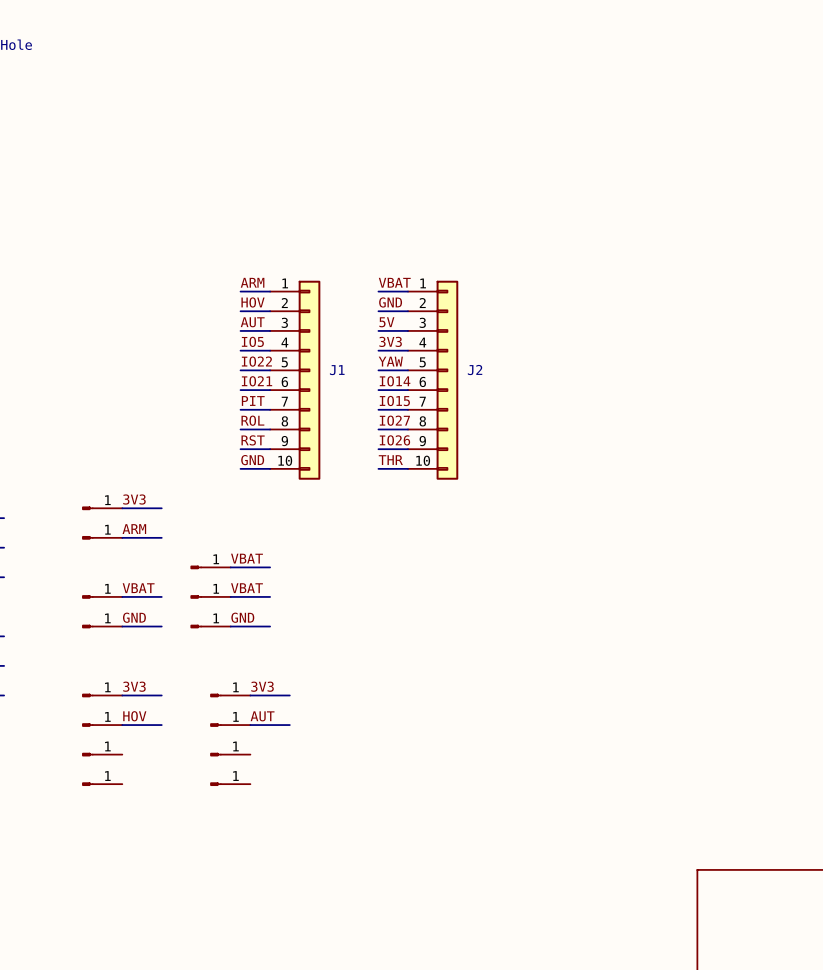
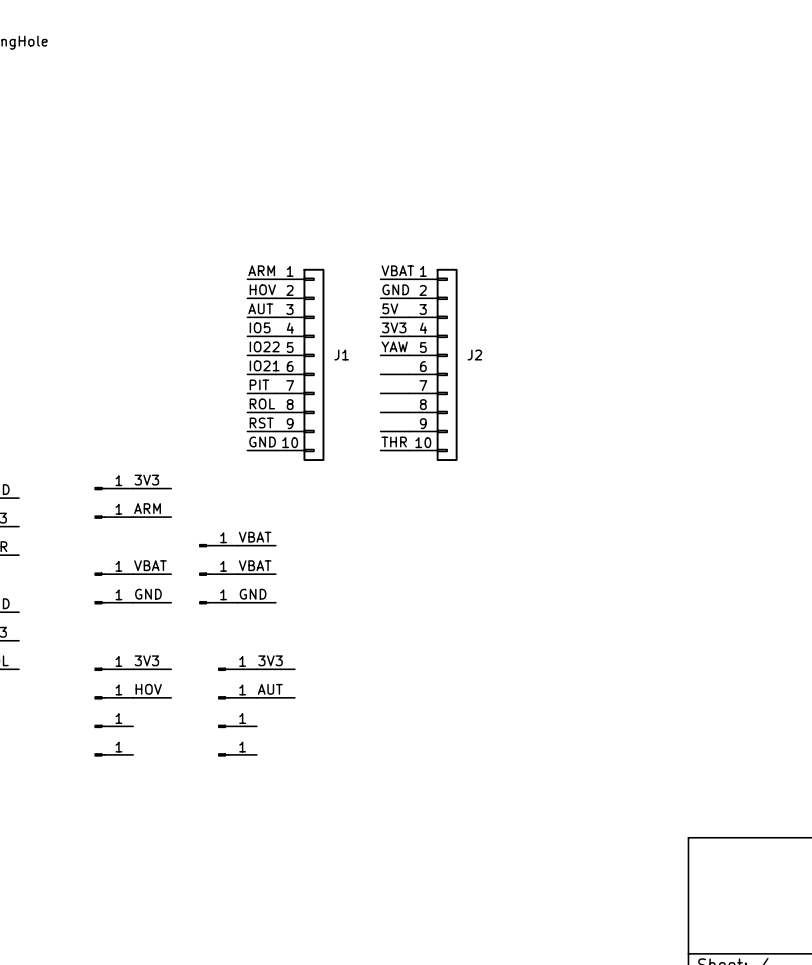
label: IO14 (395, 381) -> none
label: IO15 (394, 400) -> none
label: IO27 (394, 420) -> none
label: IO26 (394, 440) -> none

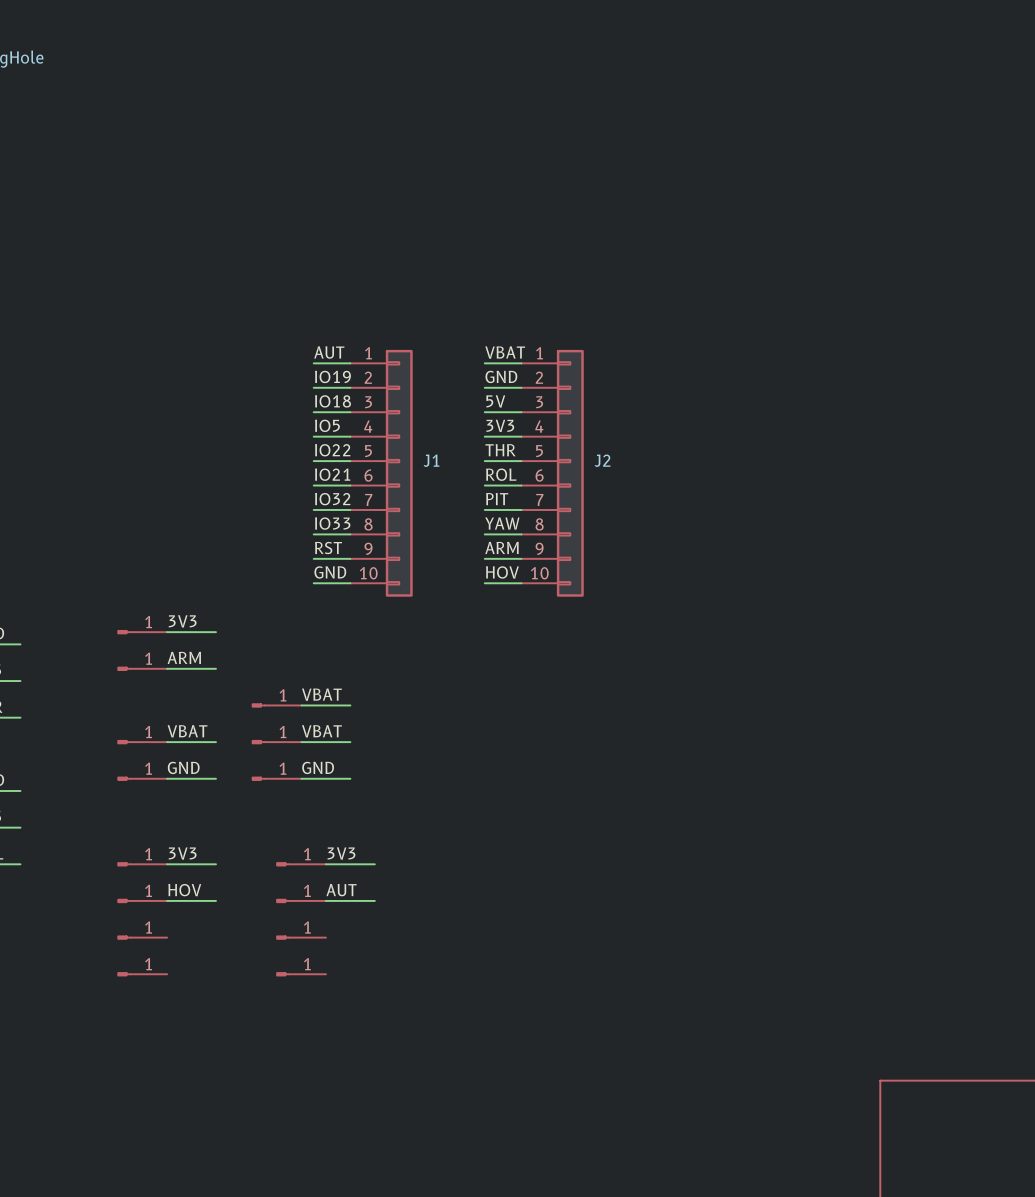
label: ARM (261, 270) -> AUT (329, 352)
label: HOV (262, 289) -> IO19 (332, 376)
label: AUT (260, 308) -> IO18 (332, 401)
label: YAW (394, 346) -> THR (500, 450)
label: none -> ROL (501, 474)
label: PIT (259, 384) -> IO32 (332, 499)
label: none -> PIT (497, 499)
label: ROL (262, 403) -> IO33 (332, 523)
label: none -> YAW (502, 523)
label: none -> ARM (501, 547)
label: THR (394, 442) -> HOV (502, 572)

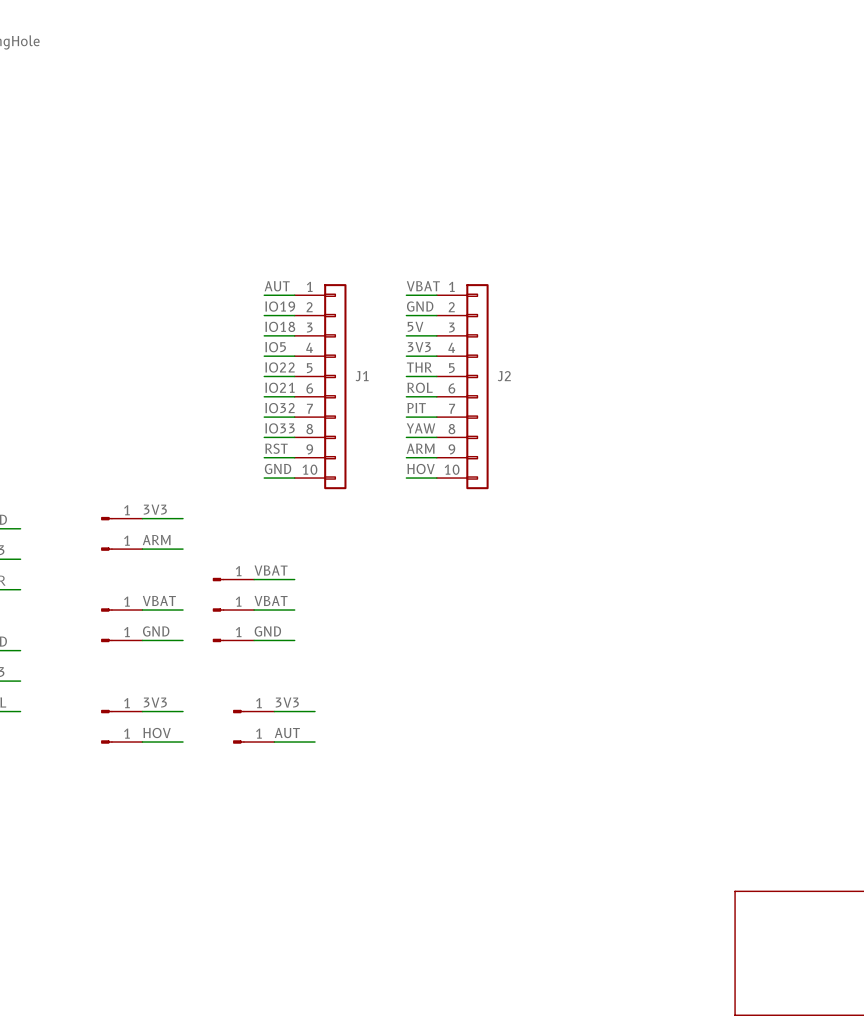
part: (142, 937) -> none
part: (301, 937) -> none
part: (142, 974) -> none
part: (301, 974) -> none

